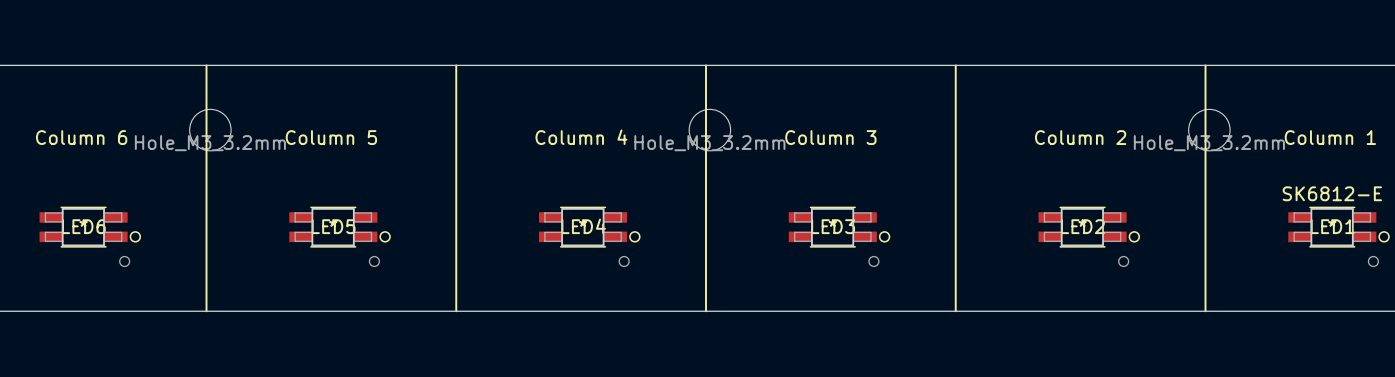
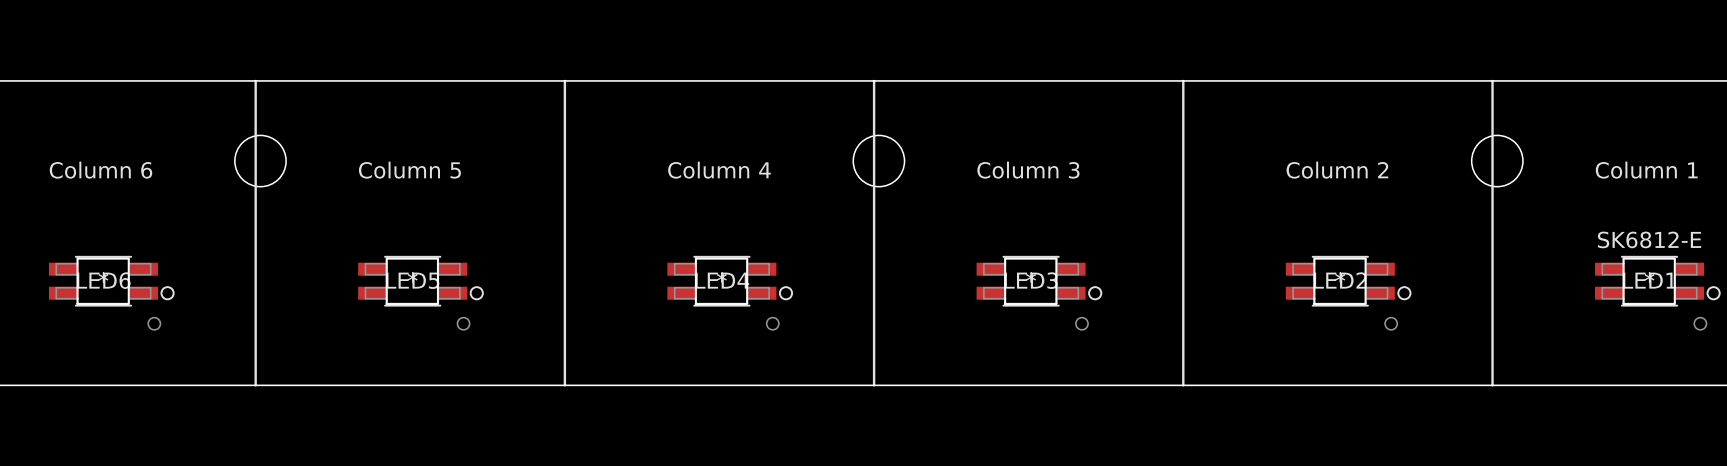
part value: Hole_M3_3.2mm (210, 143) -> none
part value: Hole_M3_3.2mm (709, 143) -> none
part value: Hole_M3_3.2mm (1209, 143) -> none

